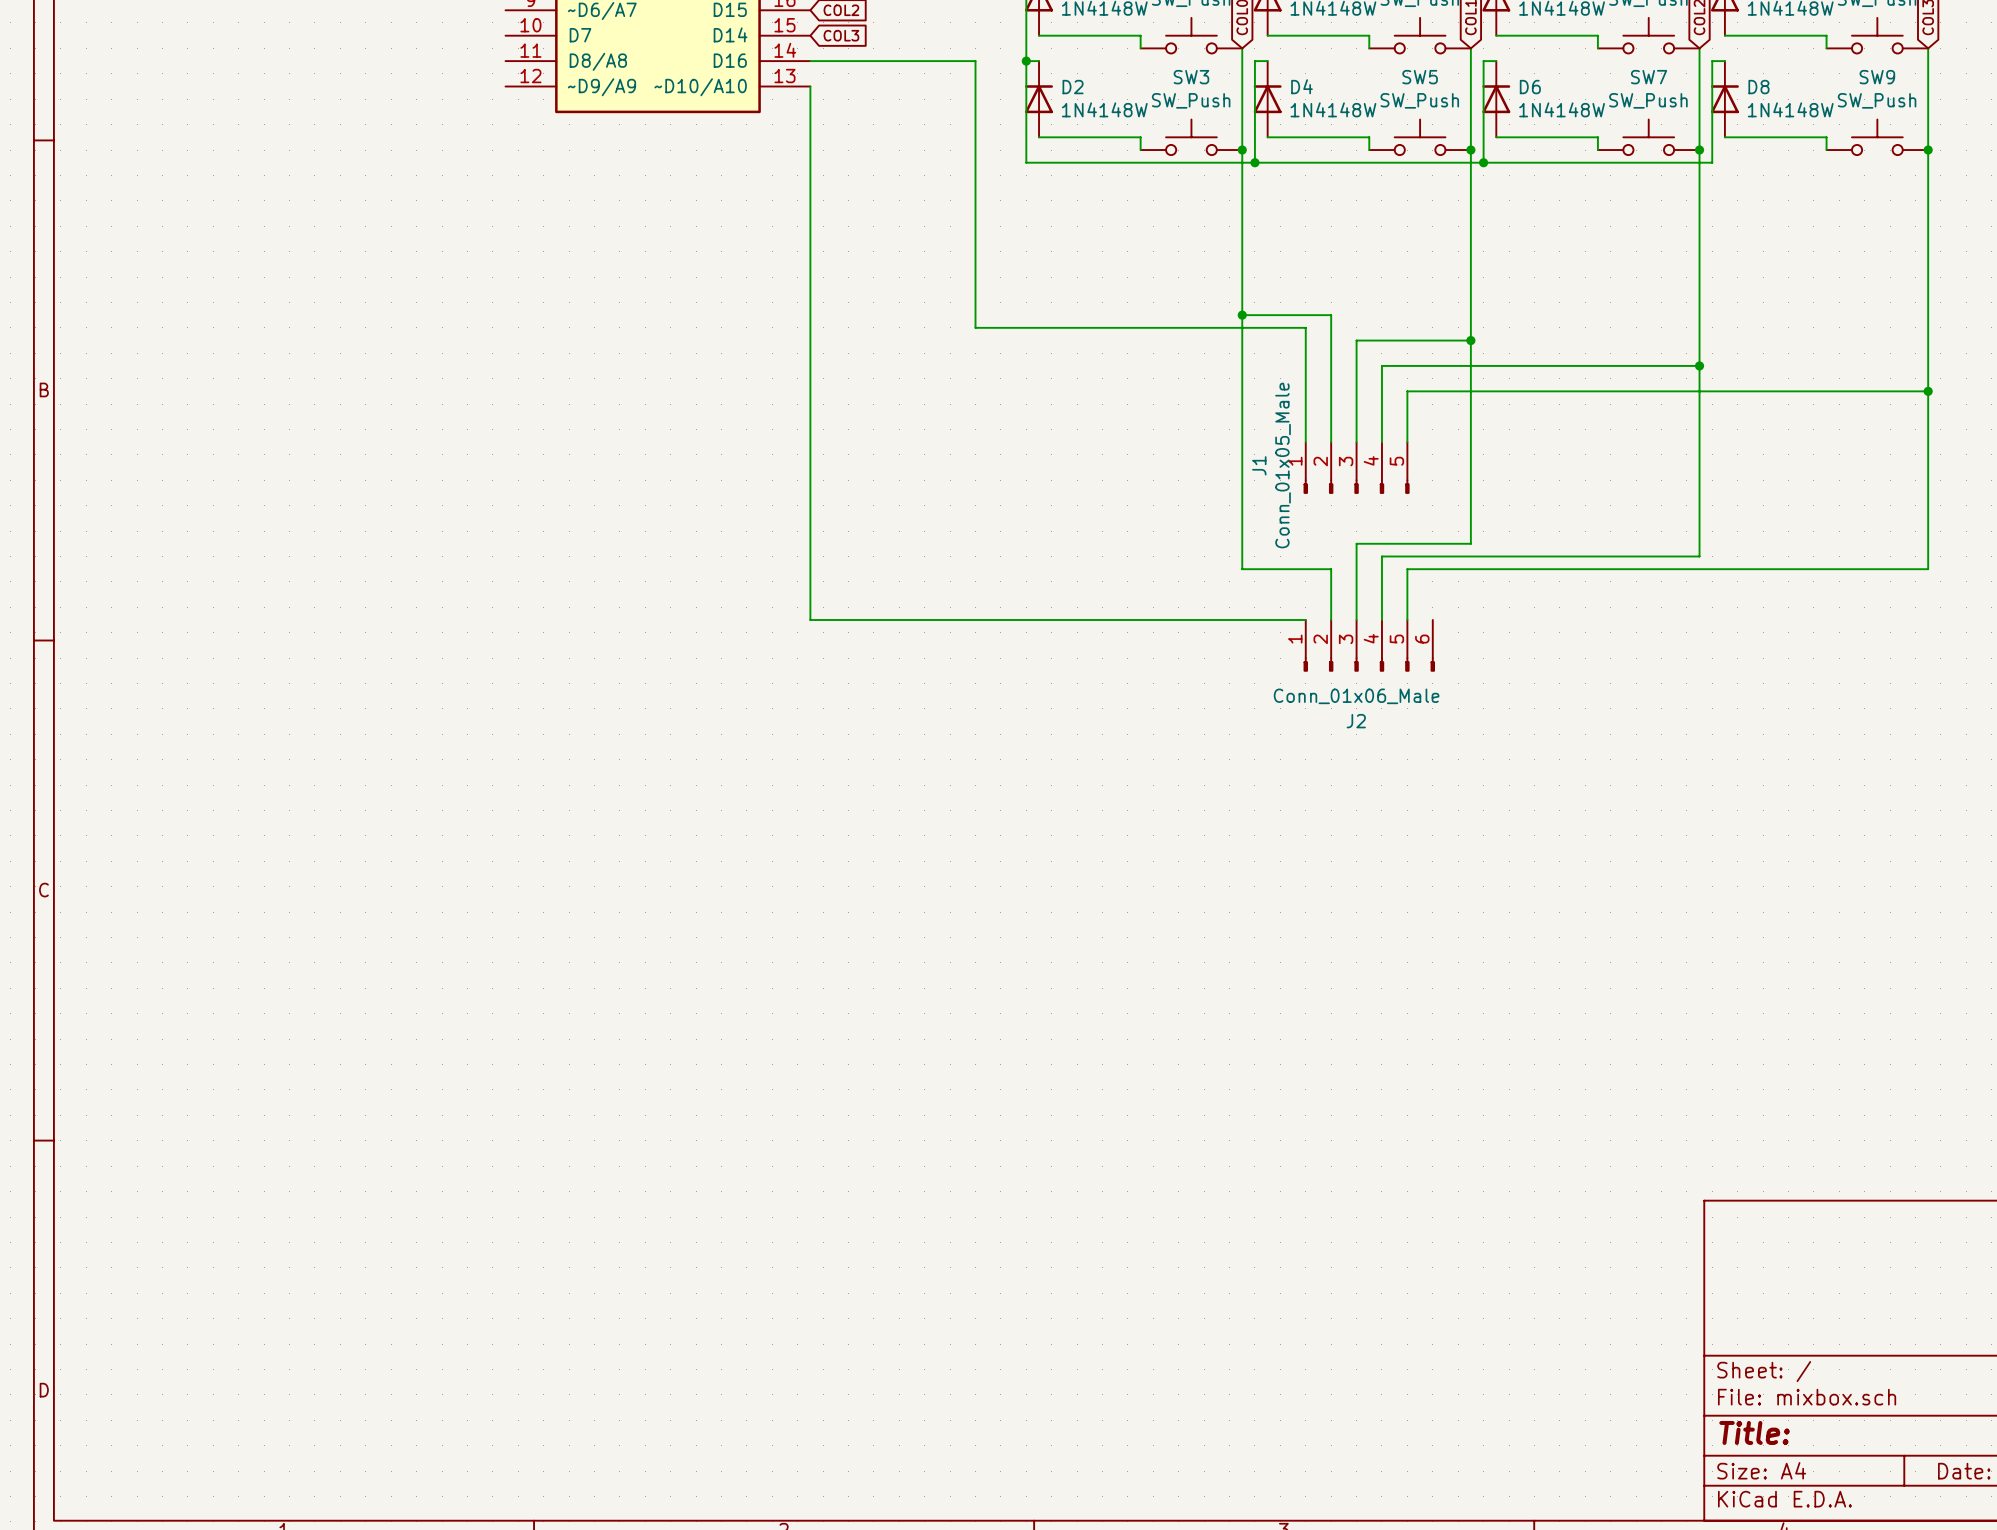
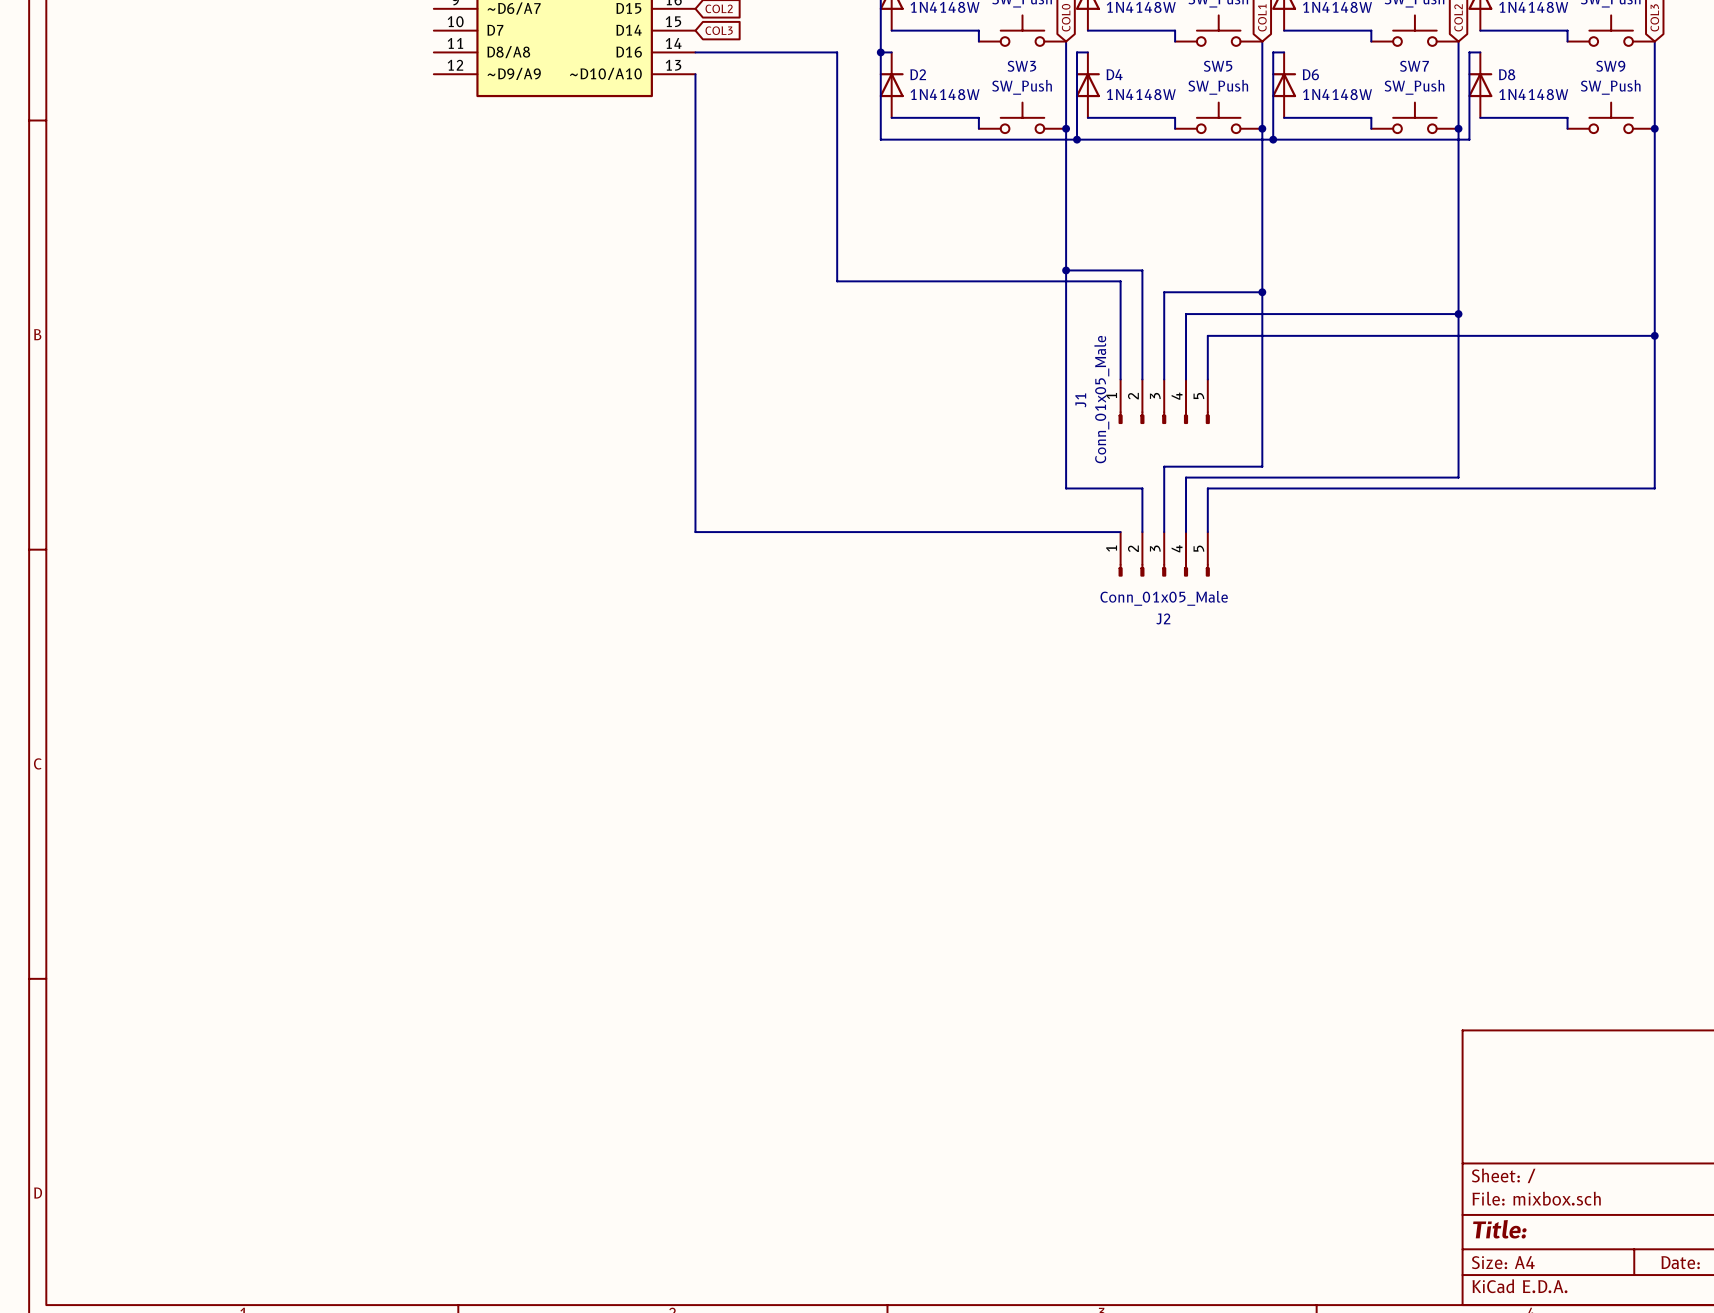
J2 symbol: [1303, 619, 1435, 672] -> [1118, 532, 1210, 577]
J2 value: Conn_01x06_Male (1356, 696) -> Conn_01x05_Male (1164, 598)

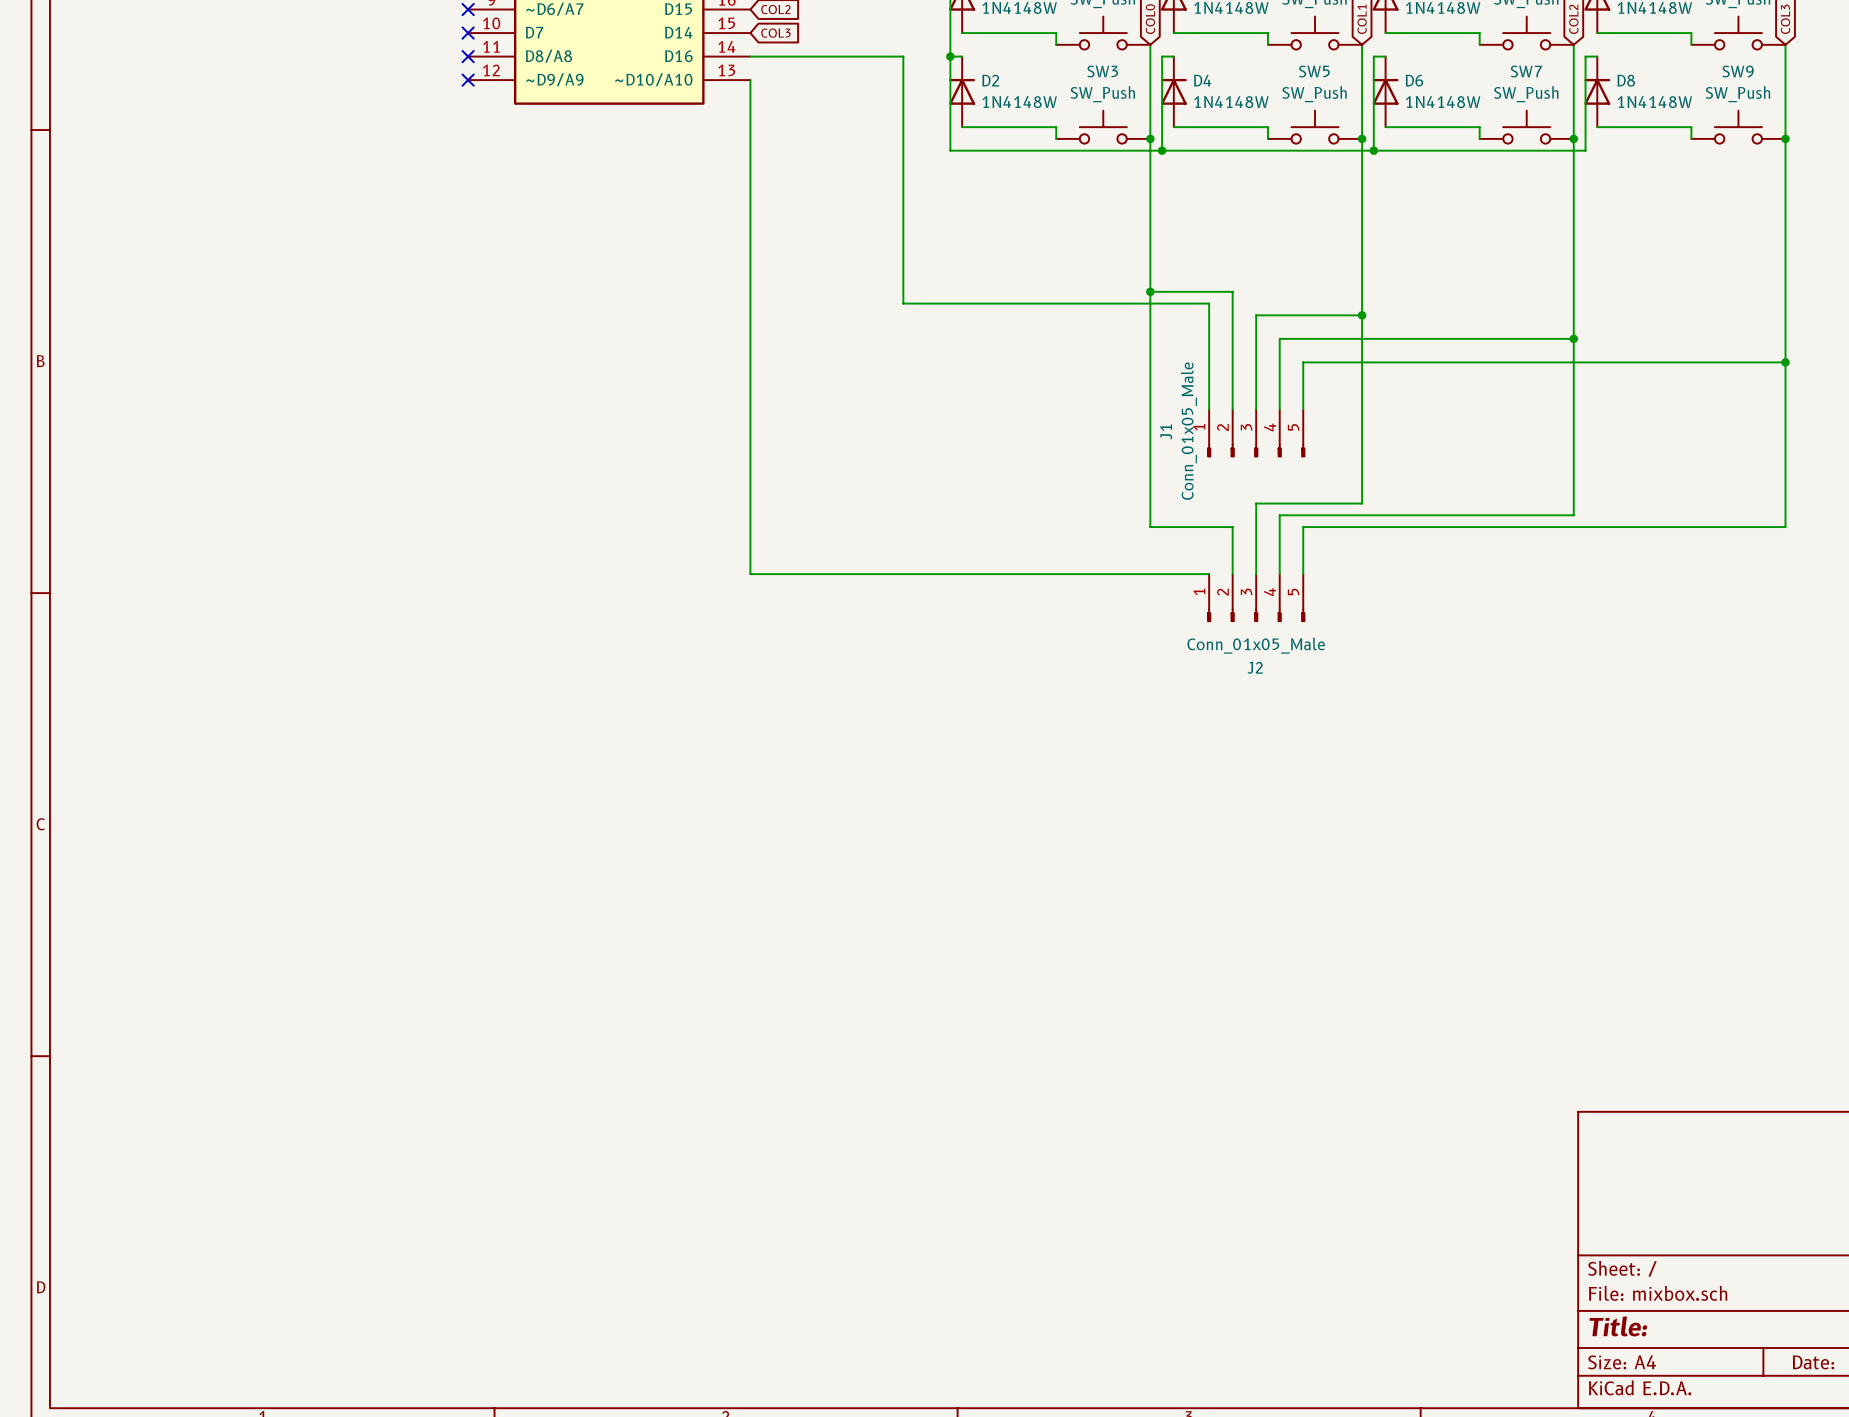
no-connect mark: none -> (468, 9)
no-connect mark: none -> (468, 33)
no-connect mark: none -> (468, 56)
no-connect mark: none -> (468, 80)

